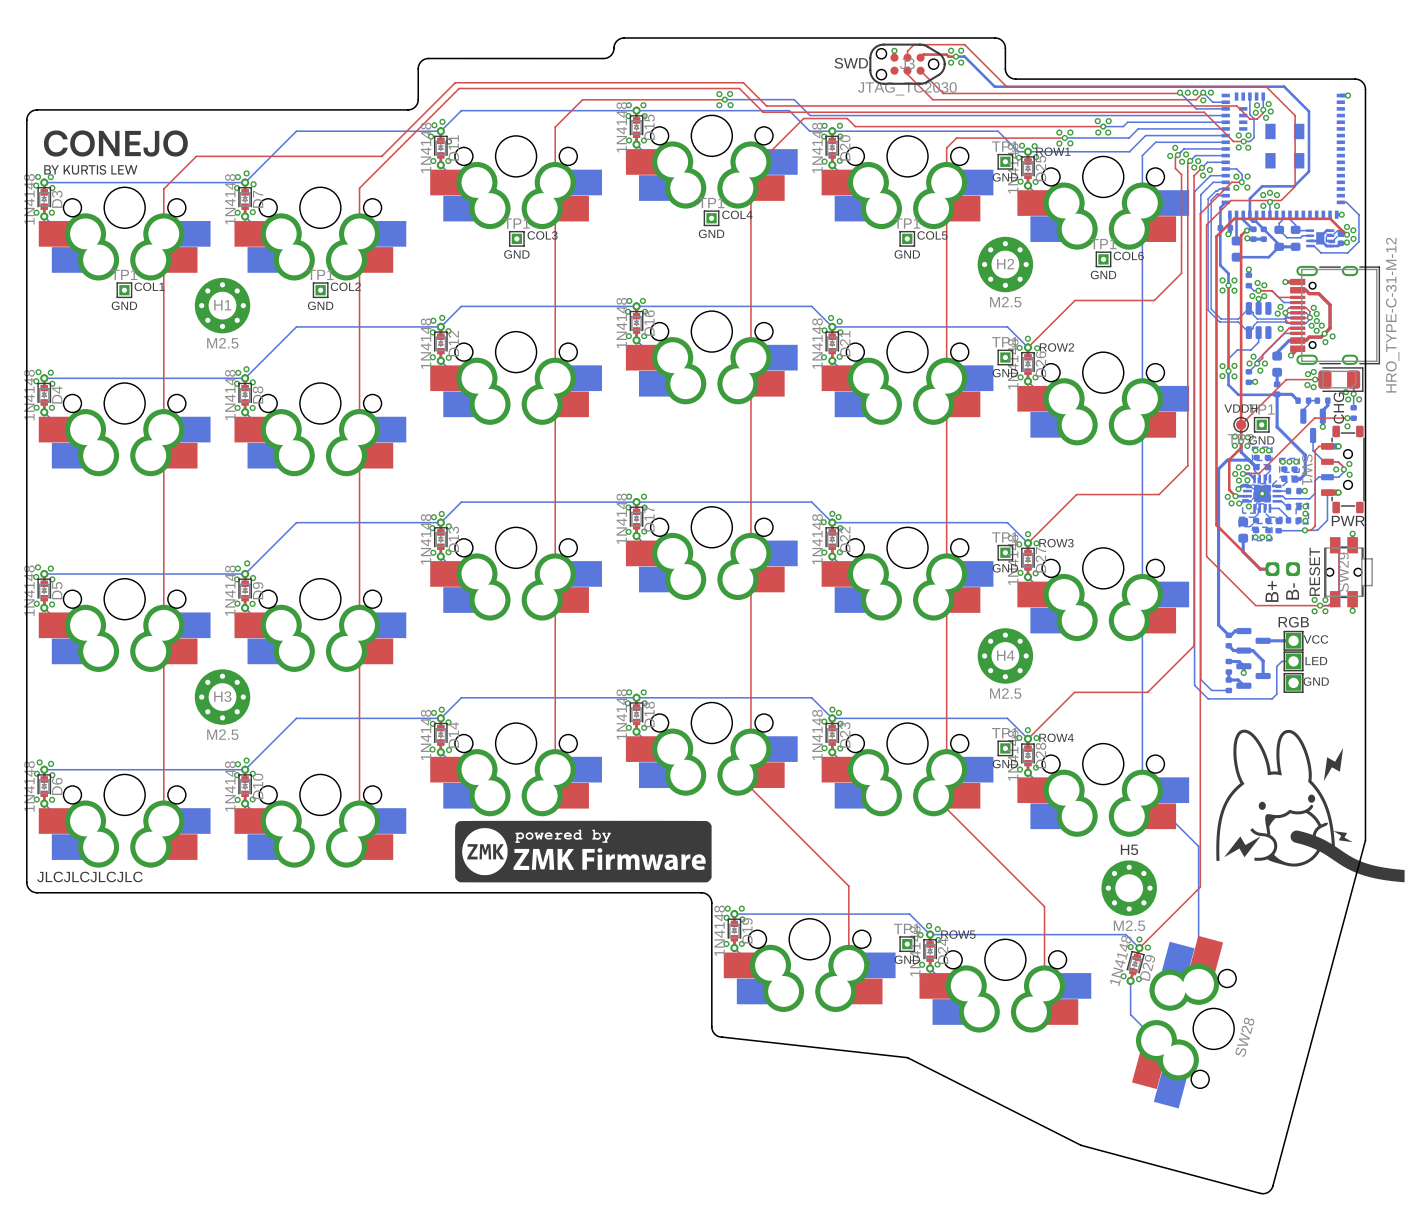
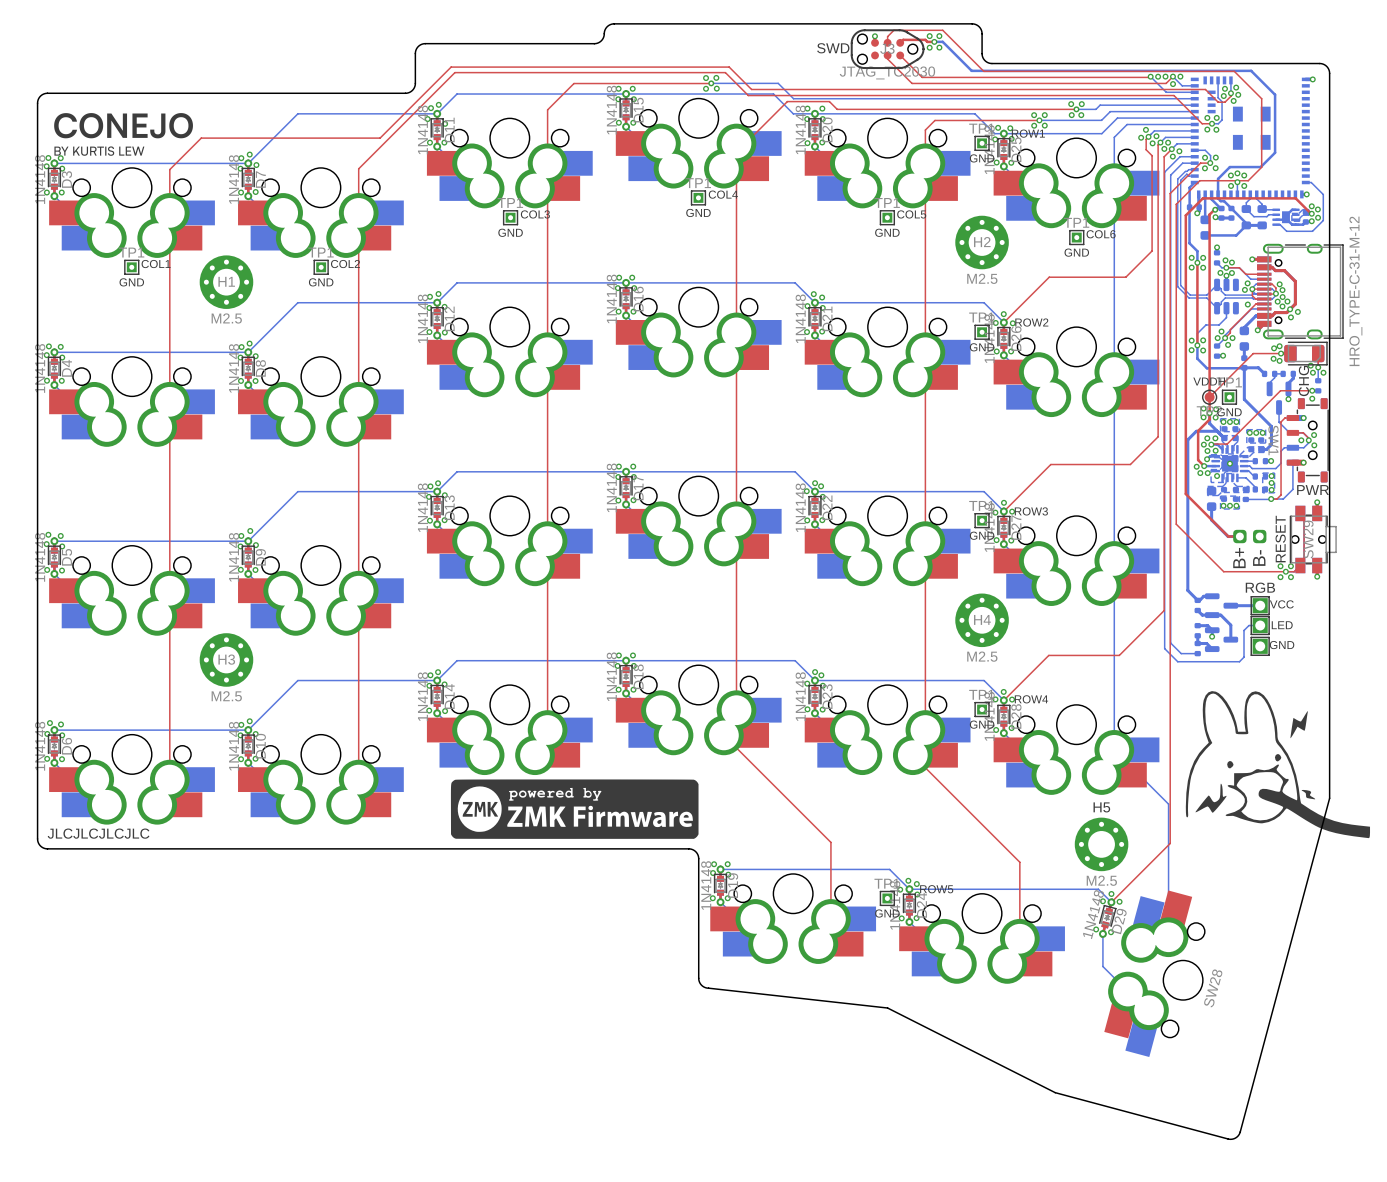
drawing shape: [1216, 729, 1405, 883] -> [1185, 691, 1371, 839]

